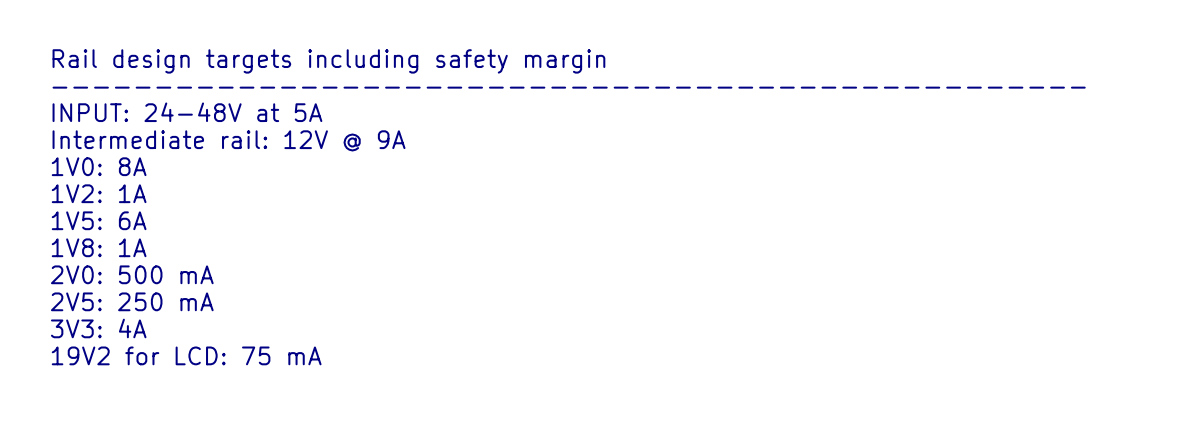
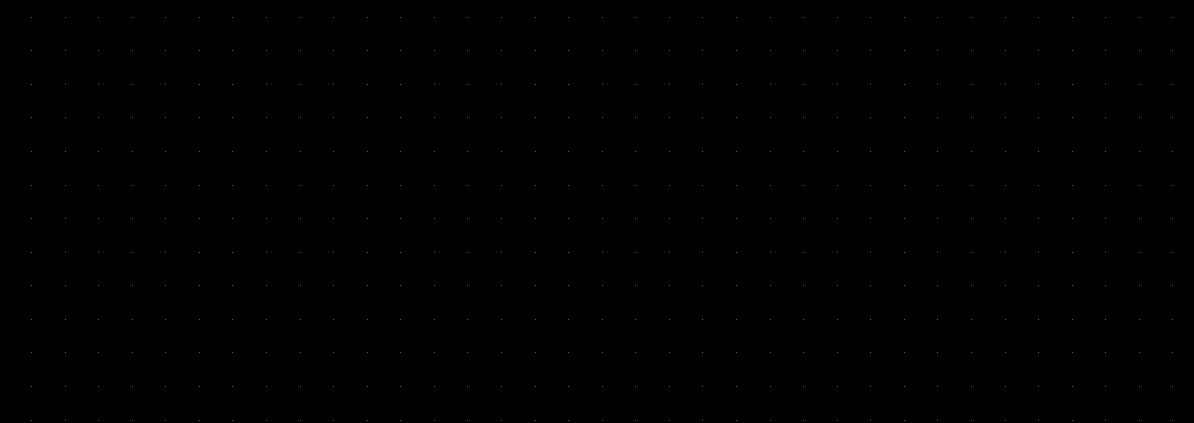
text: Rail design targets including safety margin (328, 61) -> none
text: -------------------------------------------------- (569, 87) -> none
text: INPUT: 24-48V at 5A (187, 112) -> none
text: Intermediate rail: 12V @ 9A (229, 140) -> none
text: 1V0: 8A (99, 166) -> none
text: 1V2: 1A (99, 193) -> none
text: 1V5: 6A (99, 220) -> none
text: 1V8: 1A (99, 247) -> none
text: 2V0: 500 mA (132, 274) -> none
text: 2V5: 250 mA (132, 301) -> none
text: 3V3: 4A (98, 328) -> none
text: 19V2 for LCD: 75 mA (186, 355) -> none

